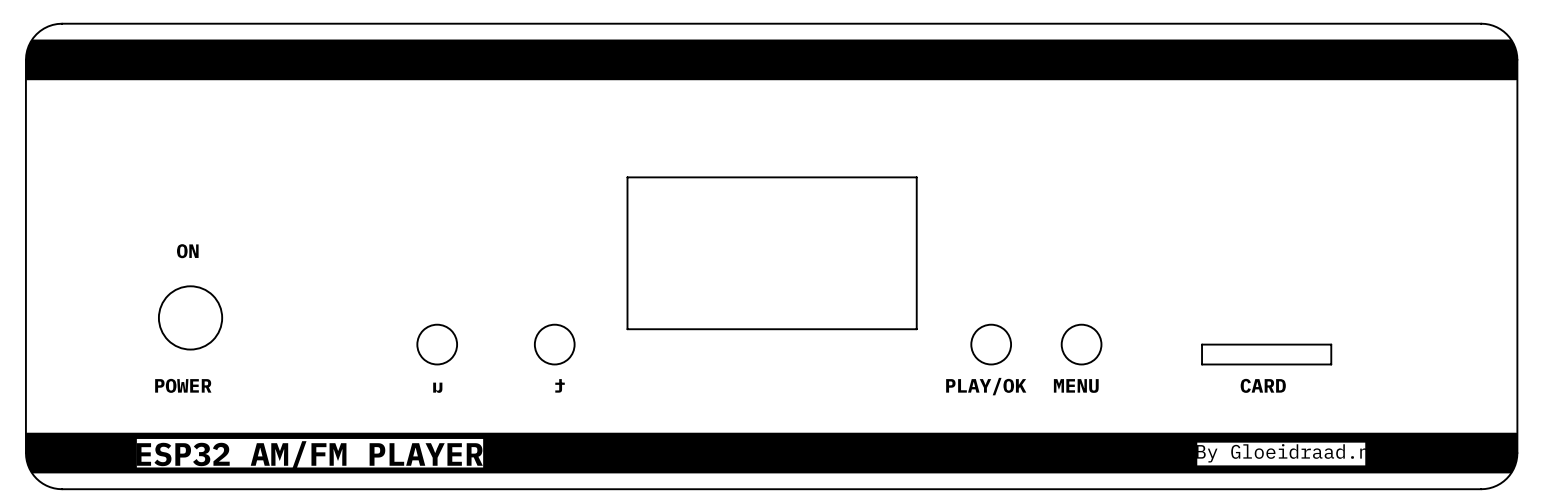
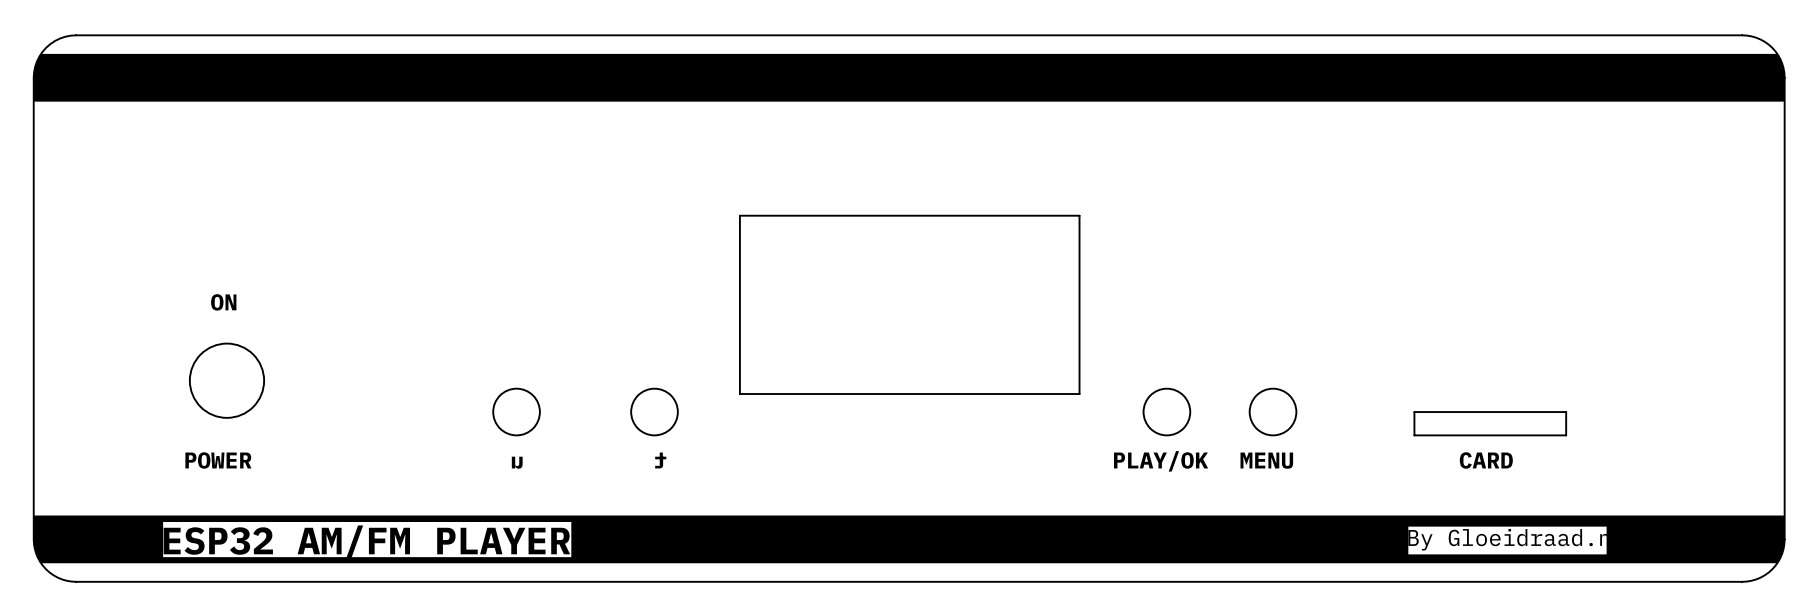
drawing shape: [25, 432, 1518, 474] -> [33, 515, 1785, 564]

